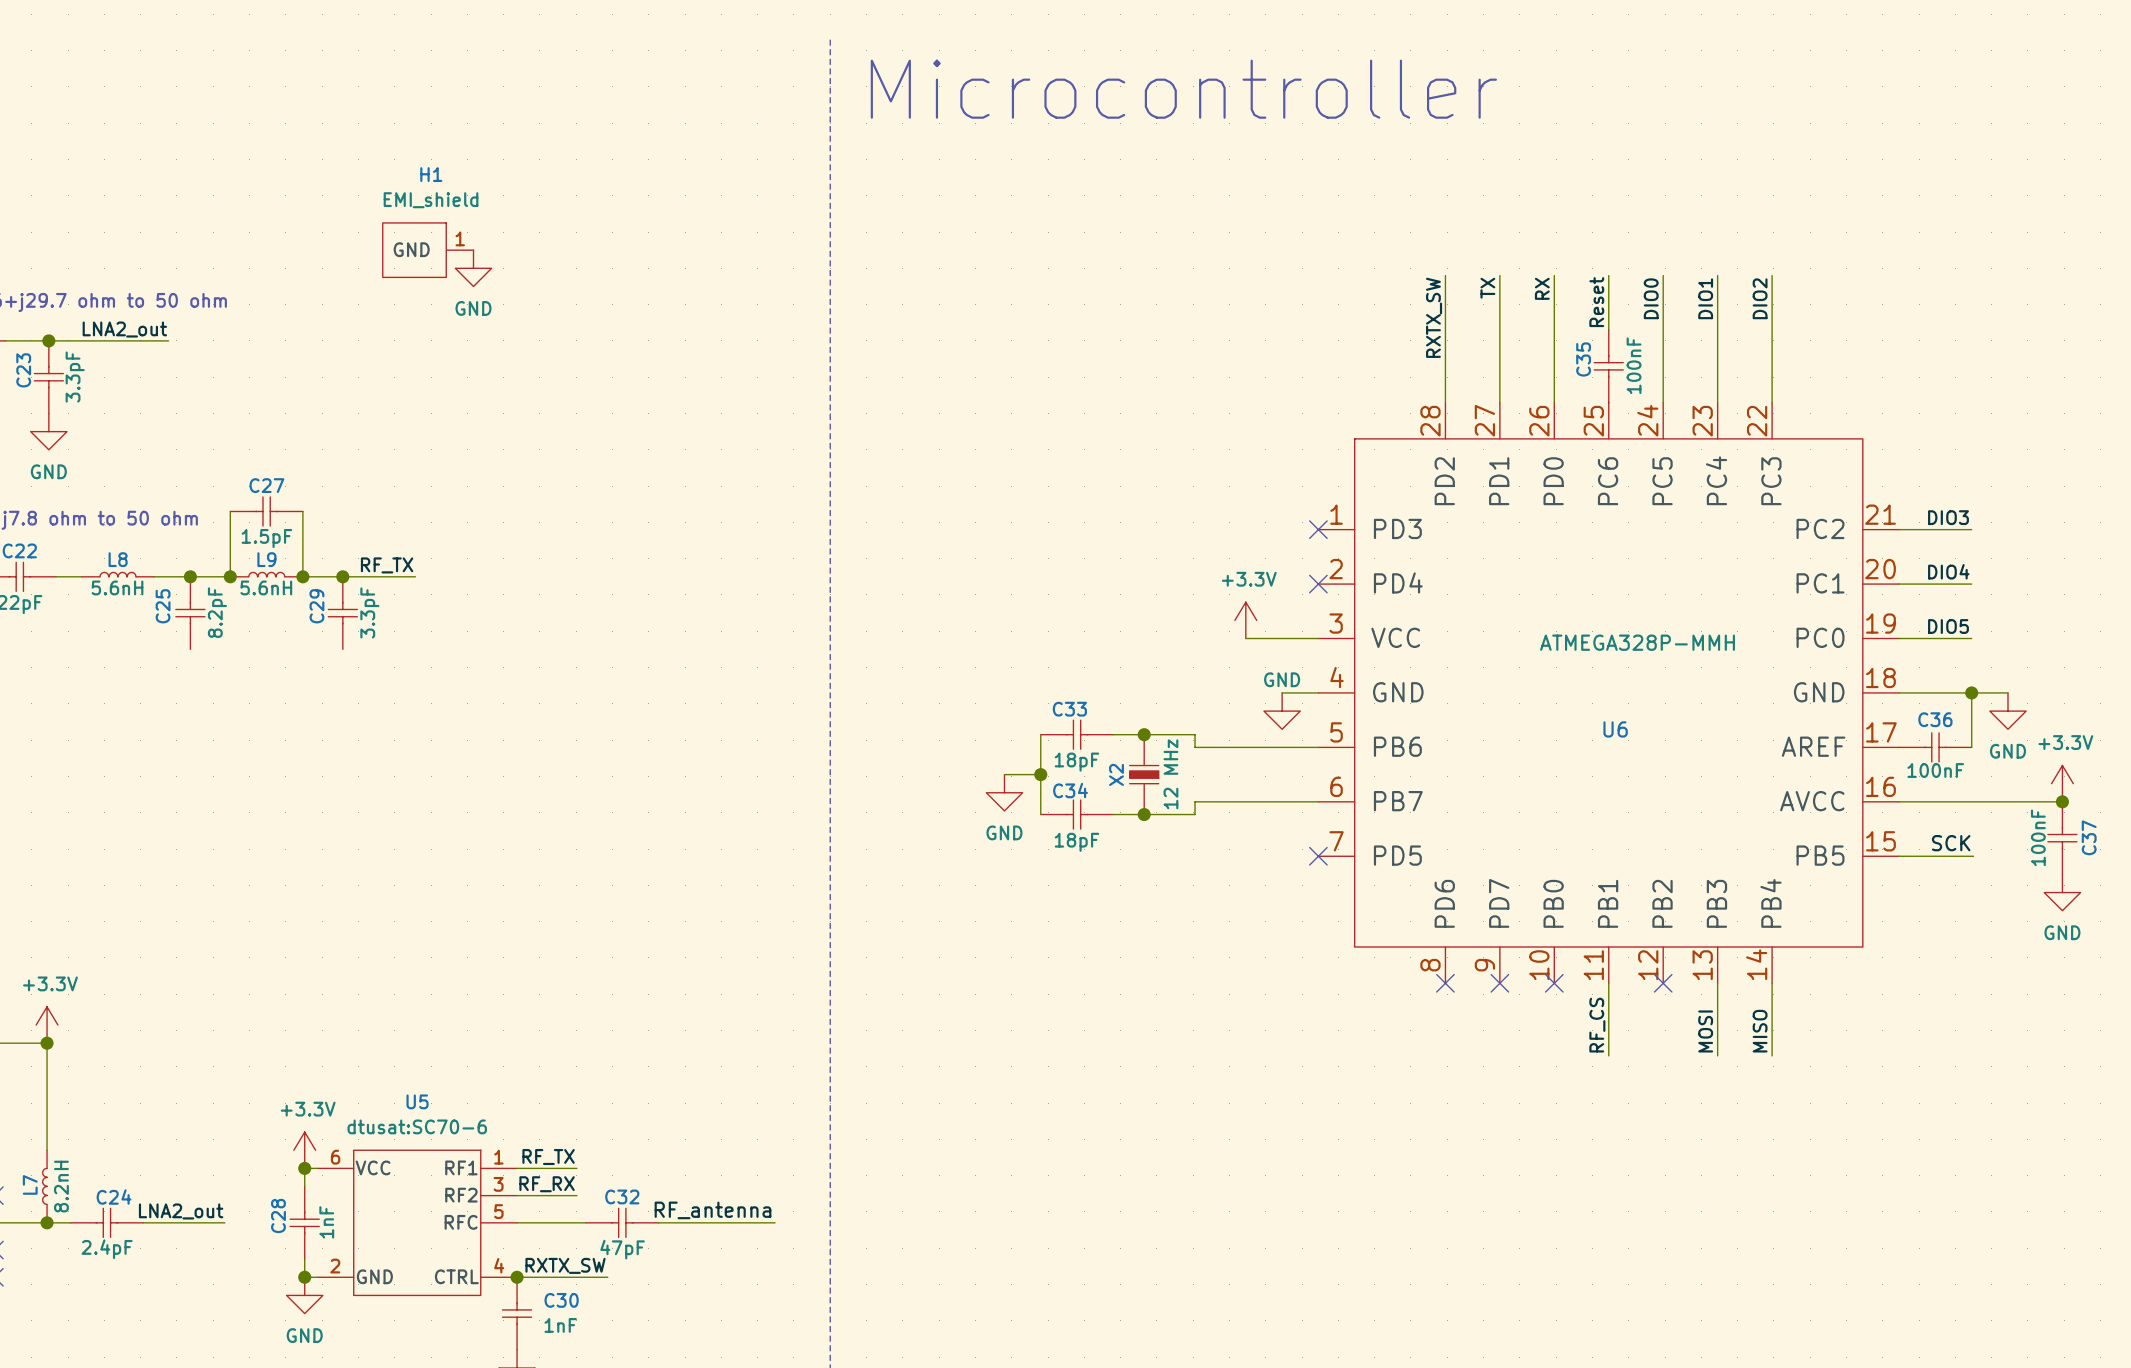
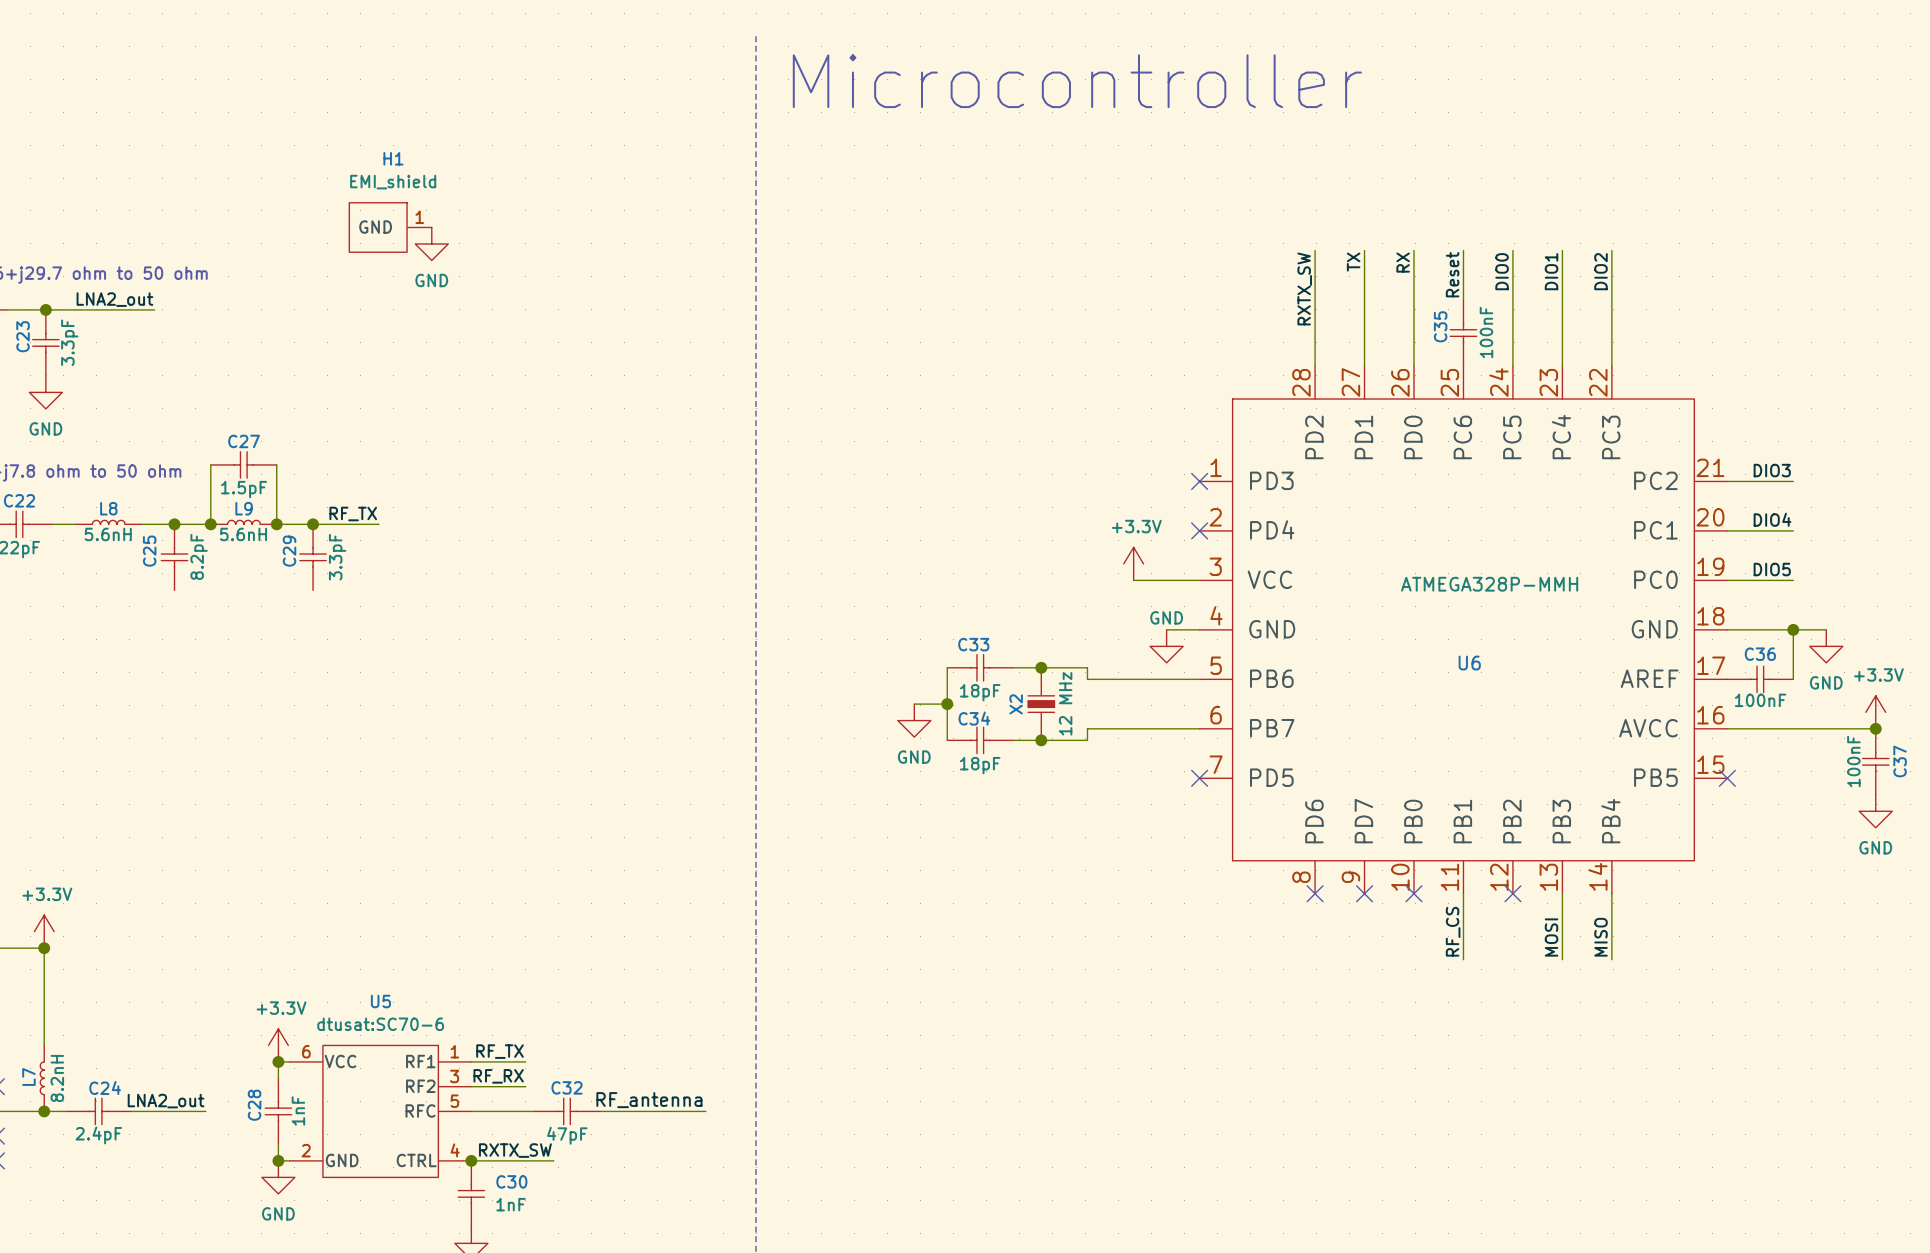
label: SCK (1951, 843) -> none
wire: (1899, 856) (1973, 856) -> none
no-connect mark: none -> (1727, 778)

